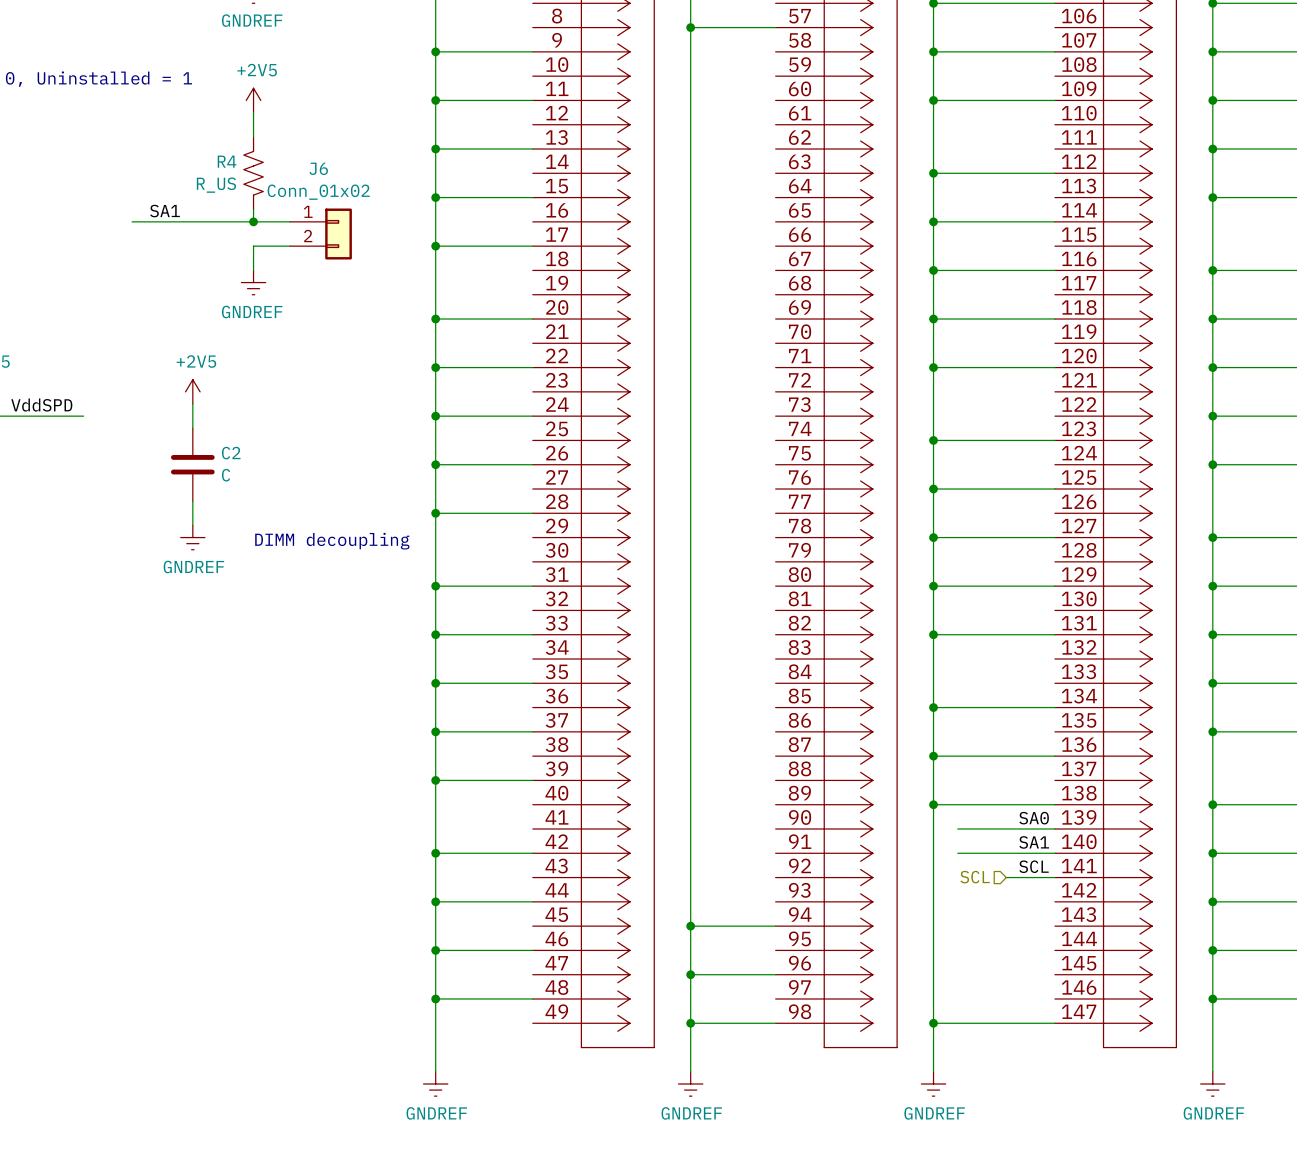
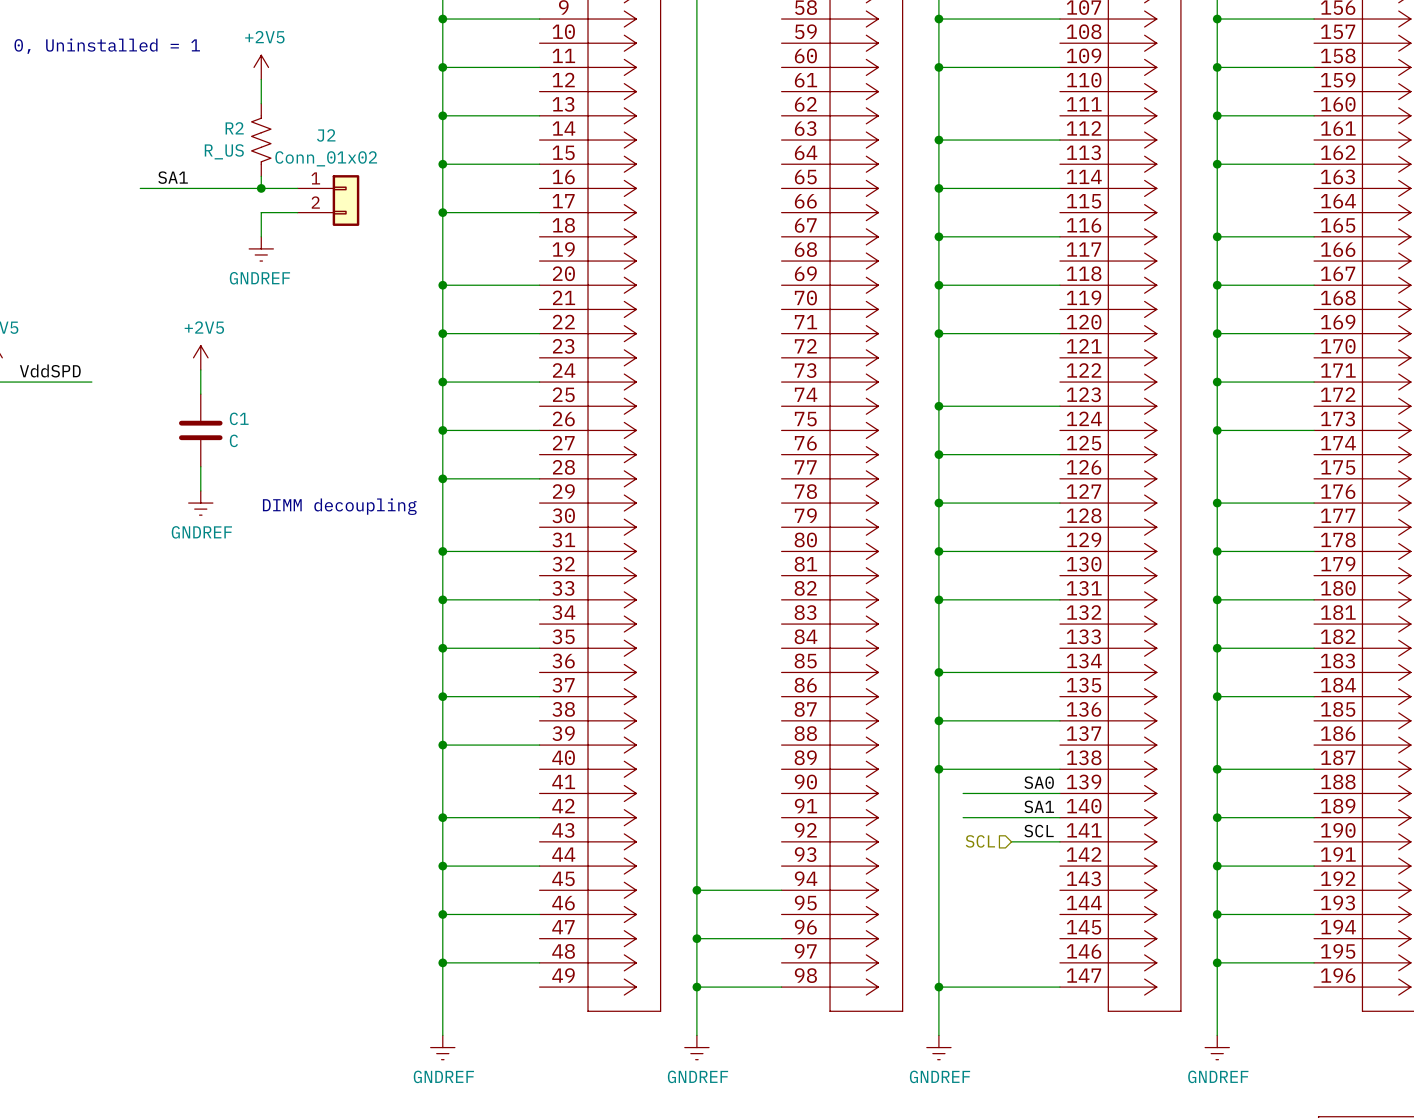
R4 name: R4 (227, 161) -> R2 (234, 128)
J6 name: J6 (318, 168) -> J2 (326, 135)
C2 name: C2 (231, 453) -> C1 (239, 418)

